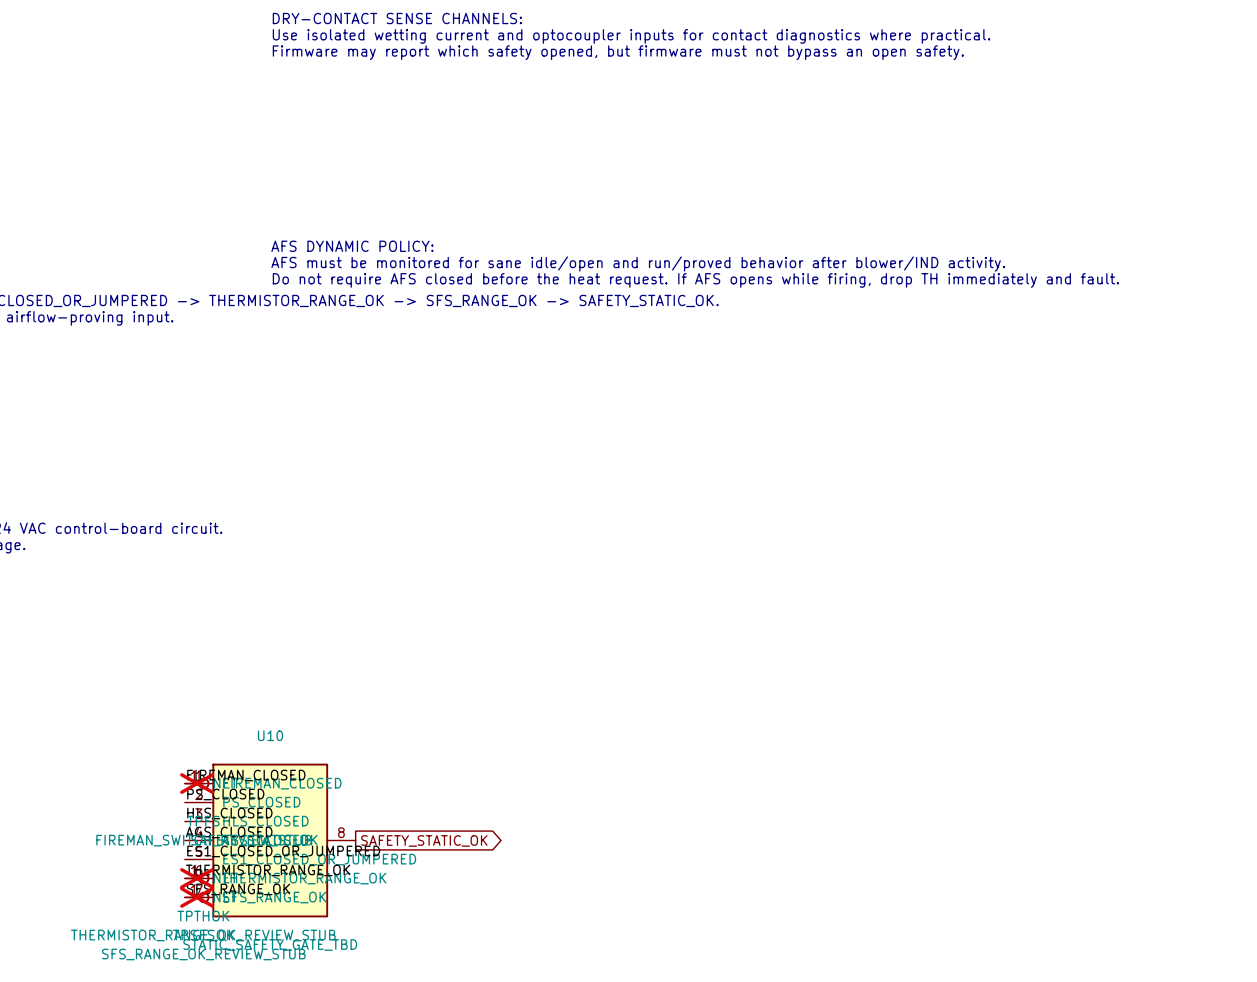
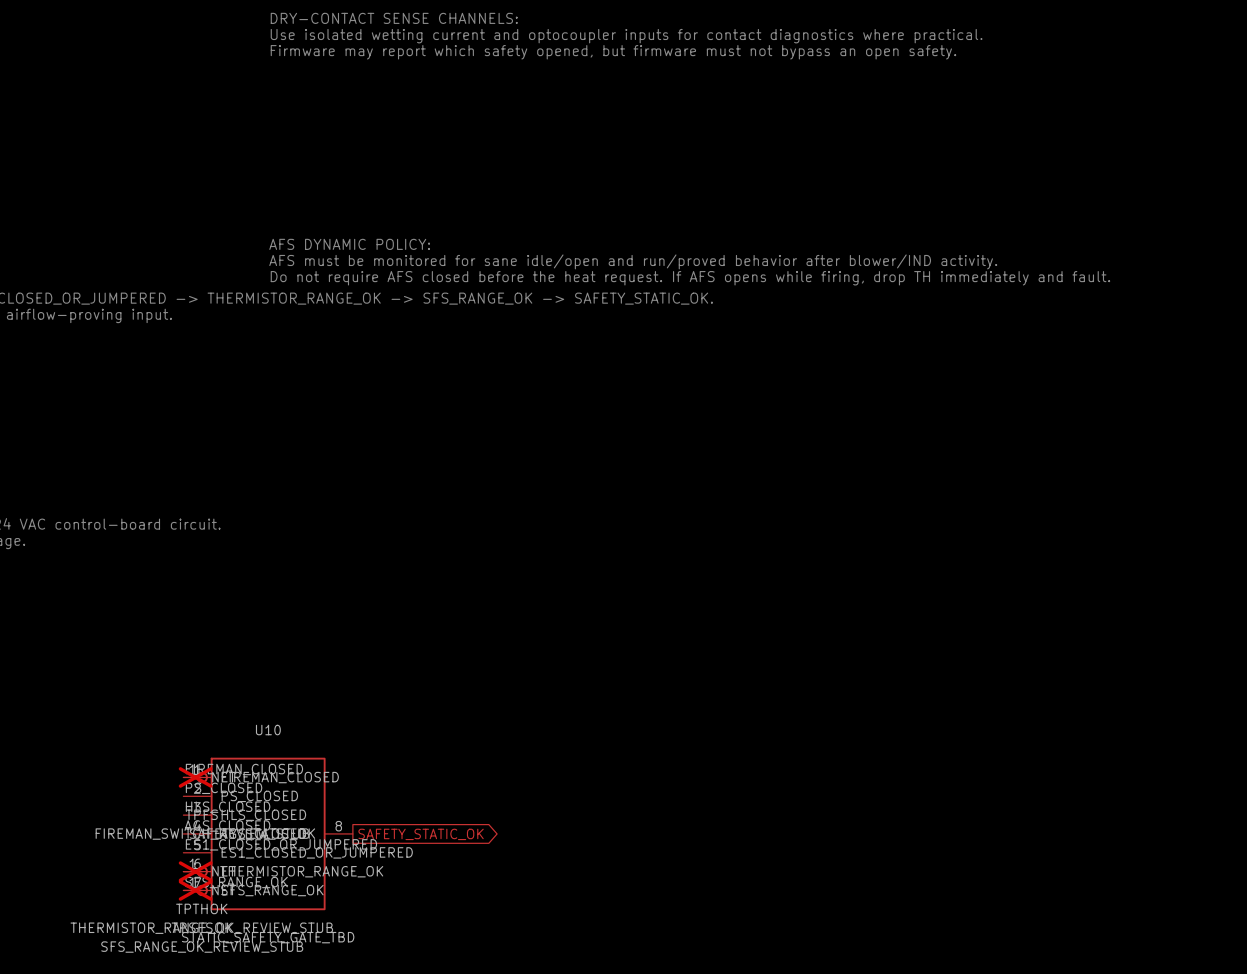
label: THERMISTOR_RANGE_OK (268, 870) -> none

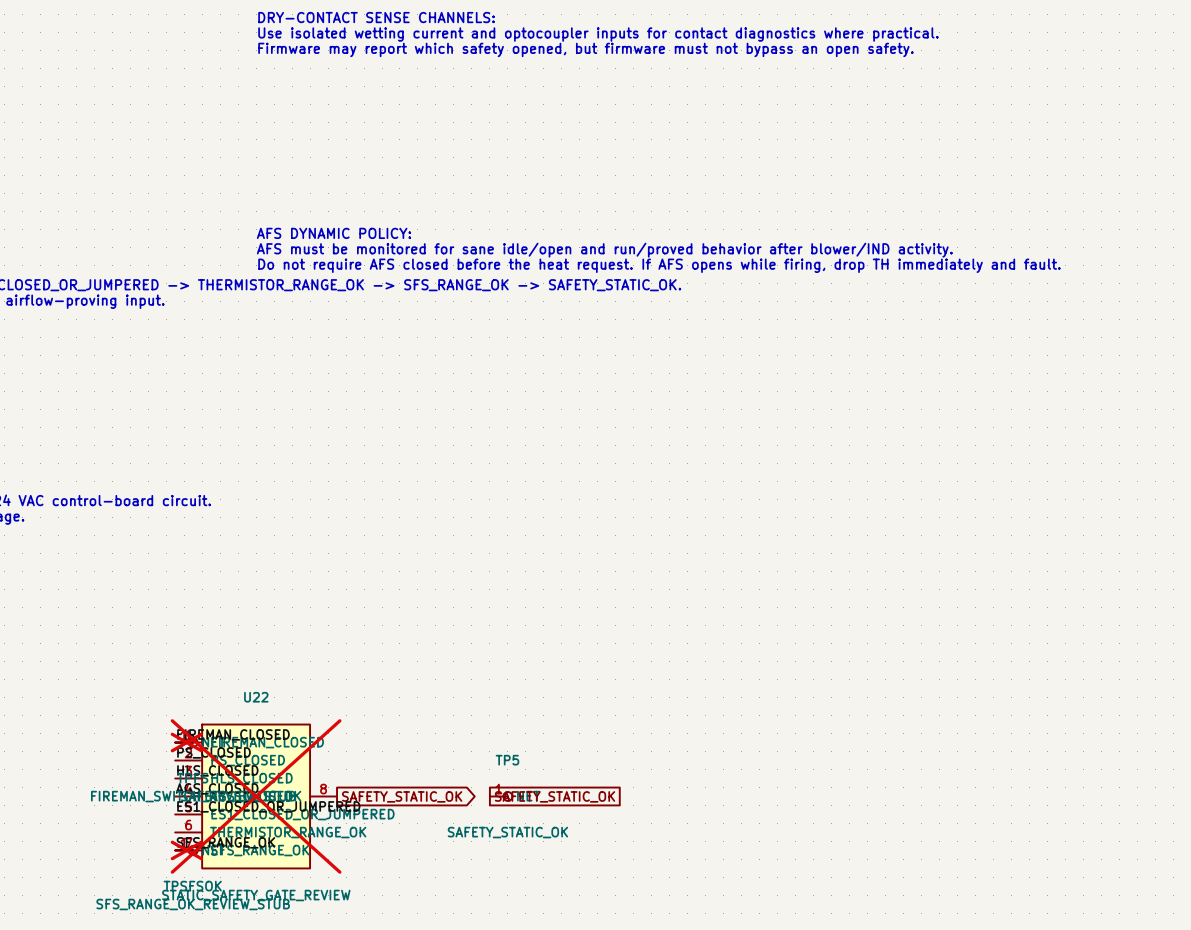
U10 name: U10 (268, 730) -> U22 (256, 697)
U10 do-not-place cross: none -> (256, 796)
TP5: none -> SAFETY_STATIC_OK (501, 796)
global label: none -> SAFETY_STATIC_OK (555, 796)
TPTHOK: THERMISTOR_RANGE_OK_REVIEW_STUB (195, 871) -> none
U10 value: STATIC_SAFETY_GATE_TBD (268, 937) -> STATIC_SAFETY_GATE_REVIEW (256, 895)

